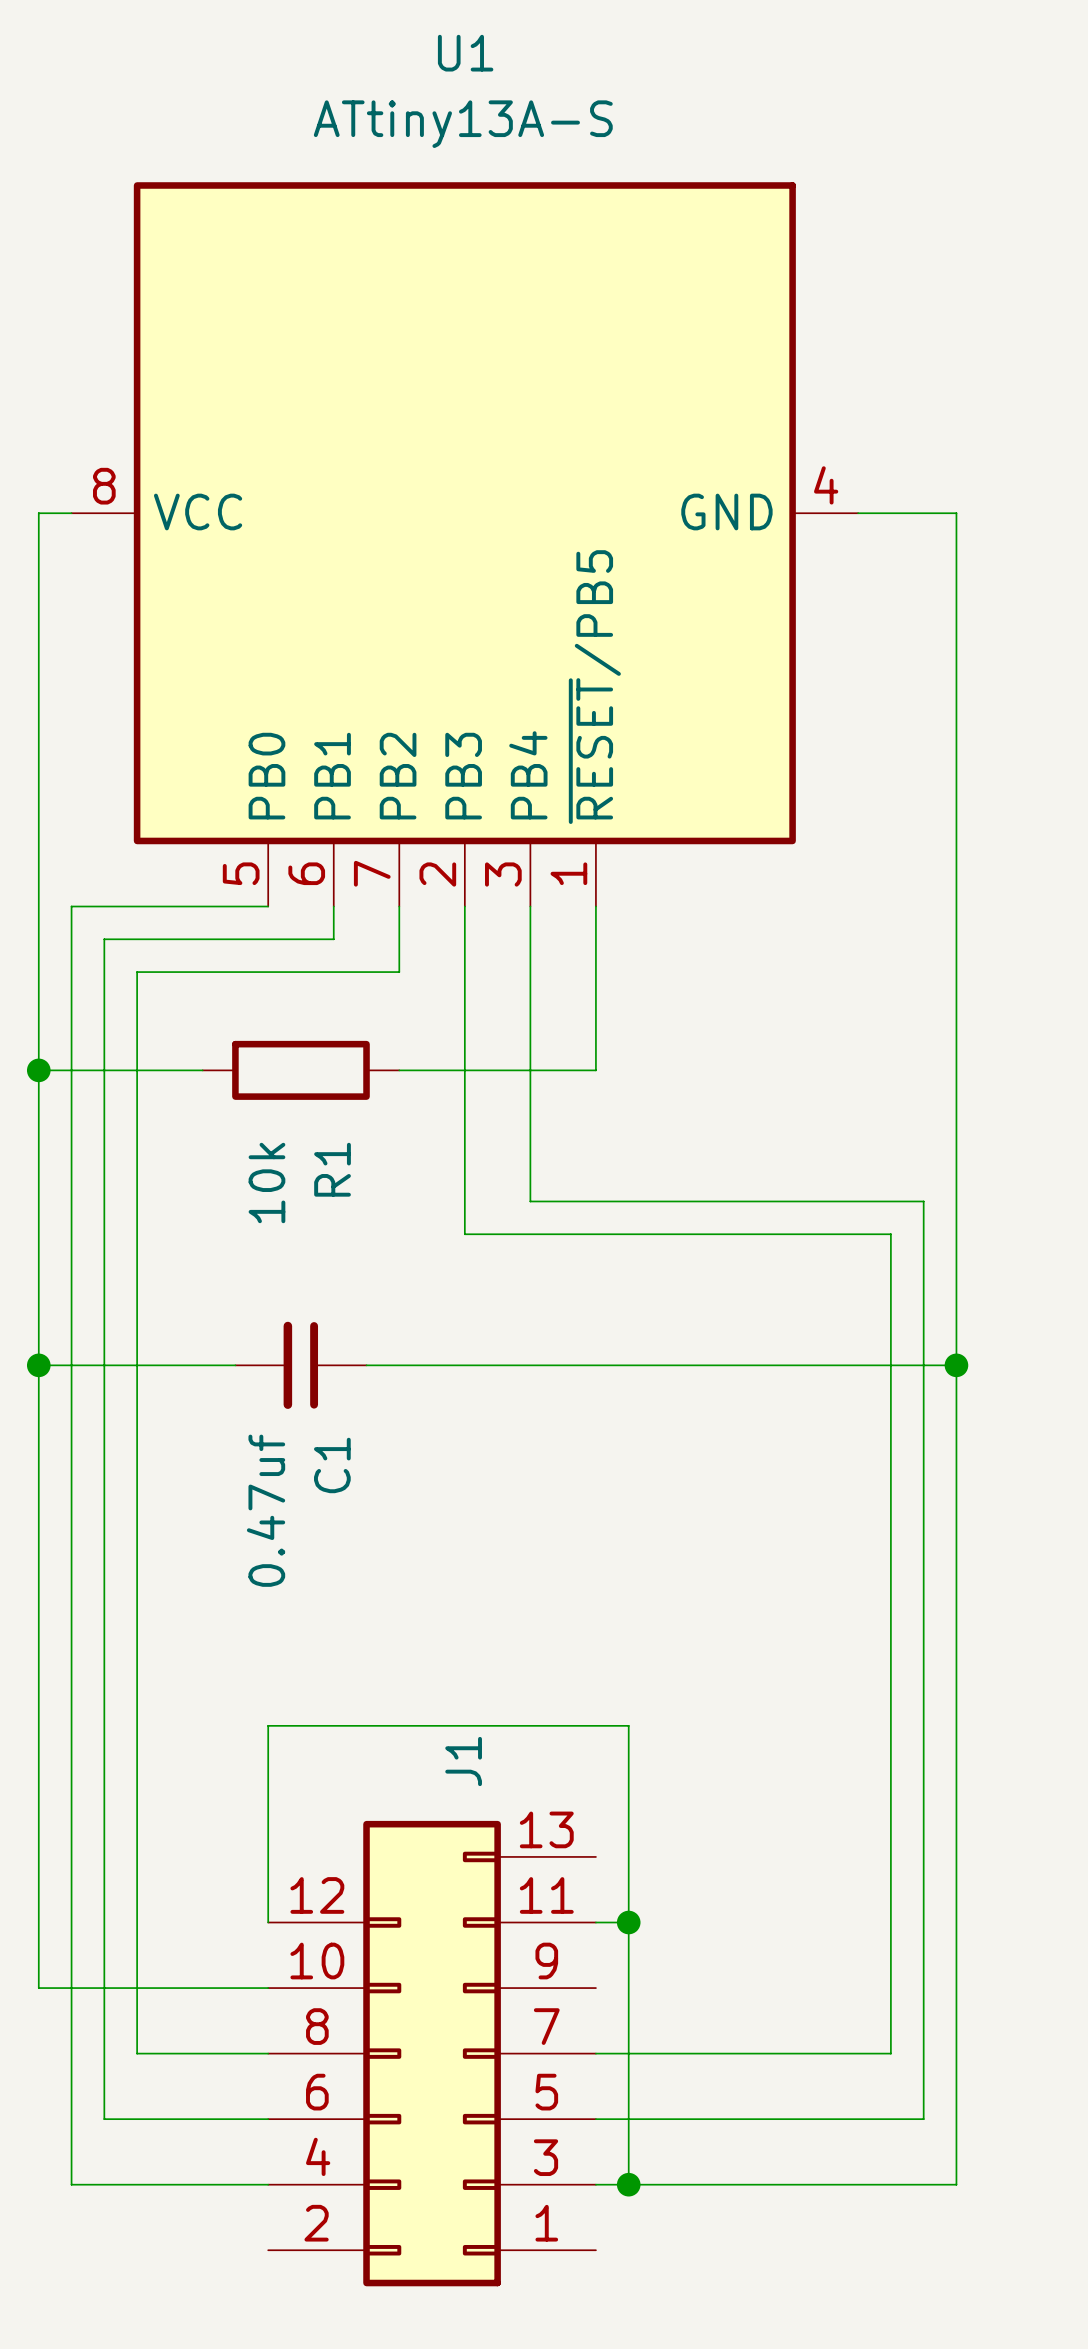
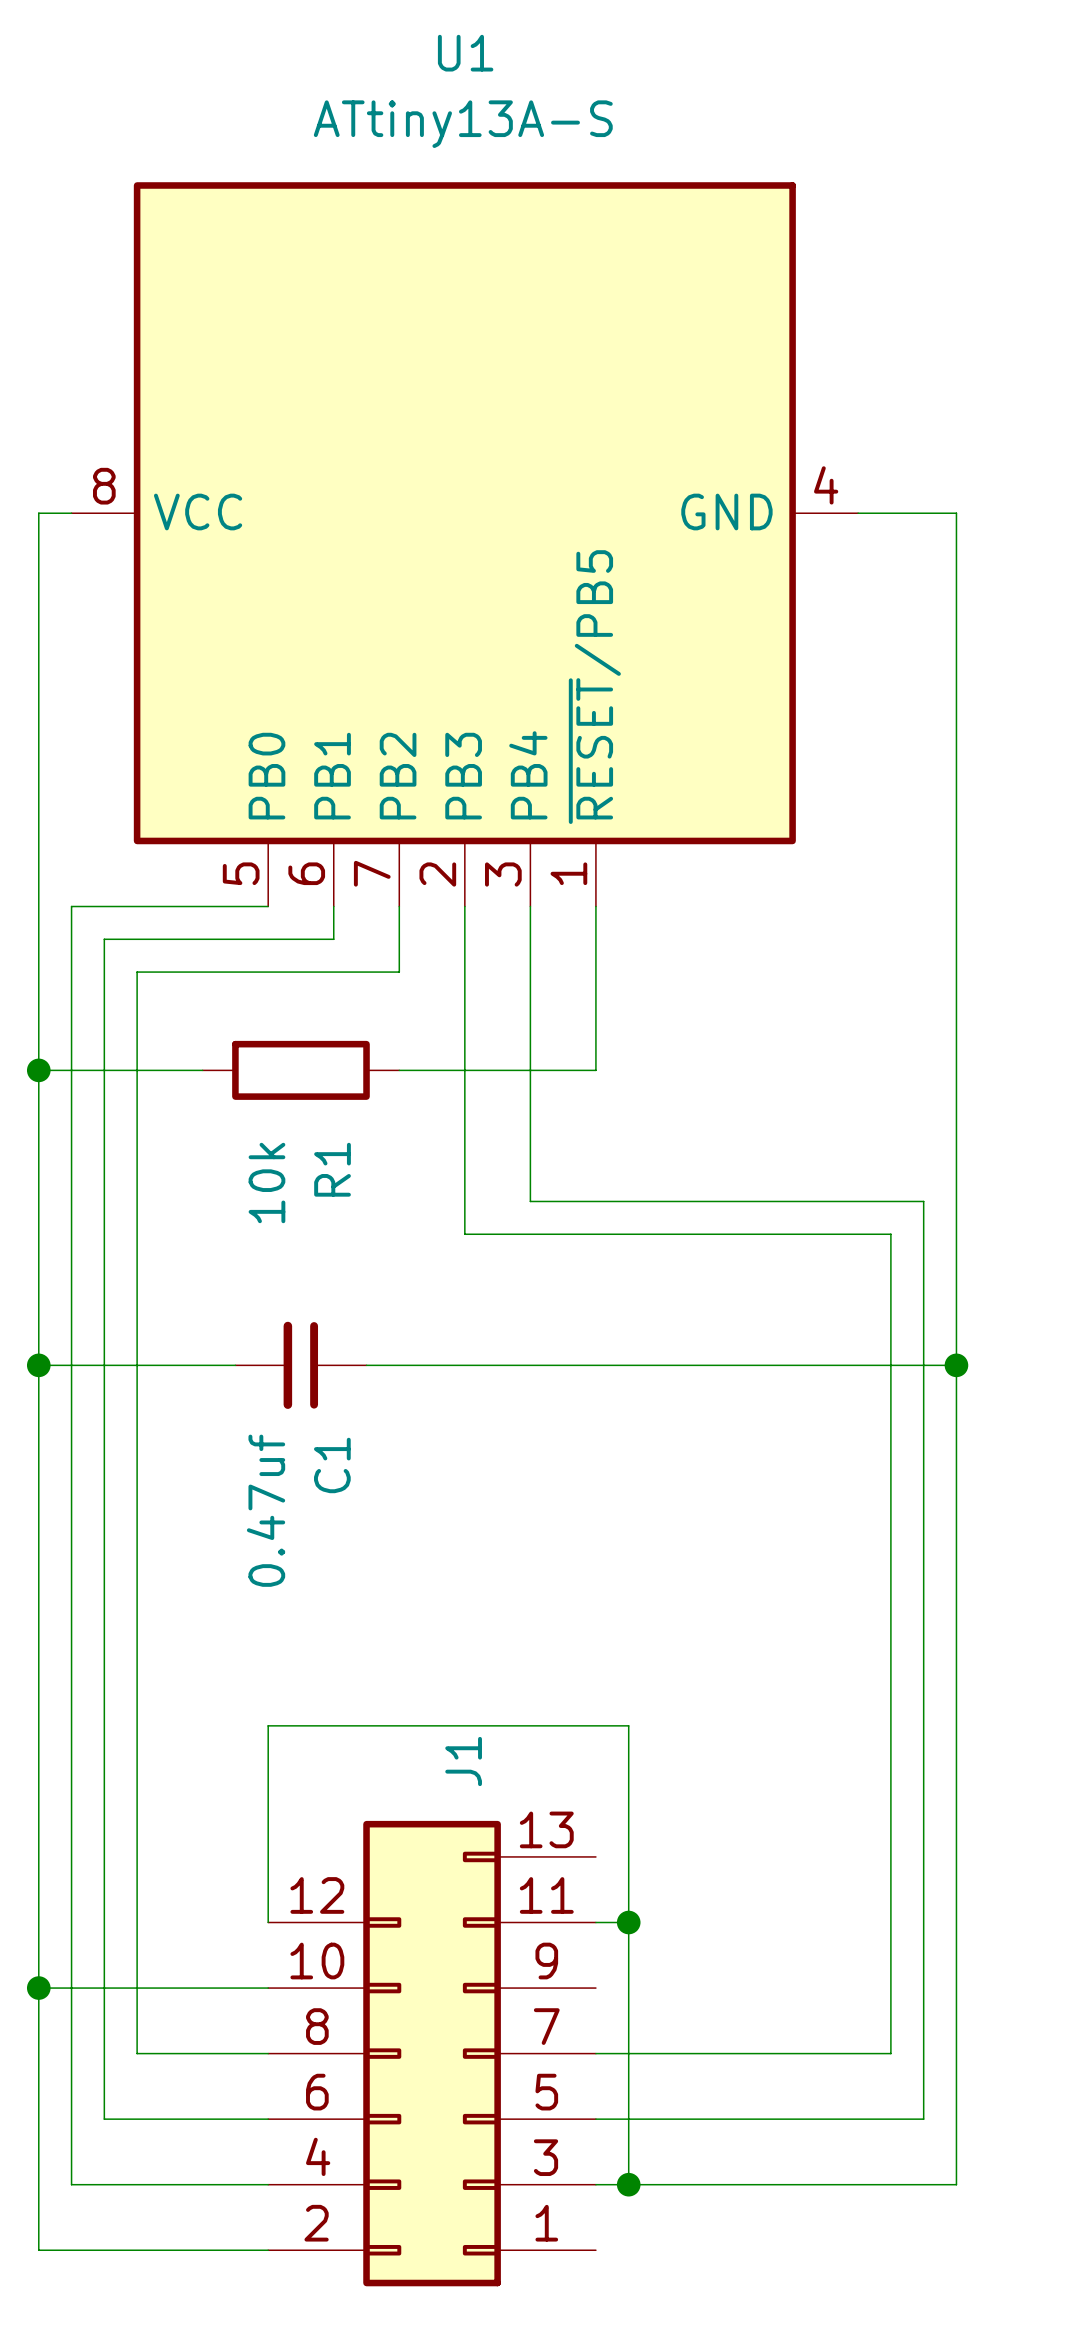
wire: none -> (38, 1988) (38, 2250) (268, 2250)
junction: none -> (38, 1988)

